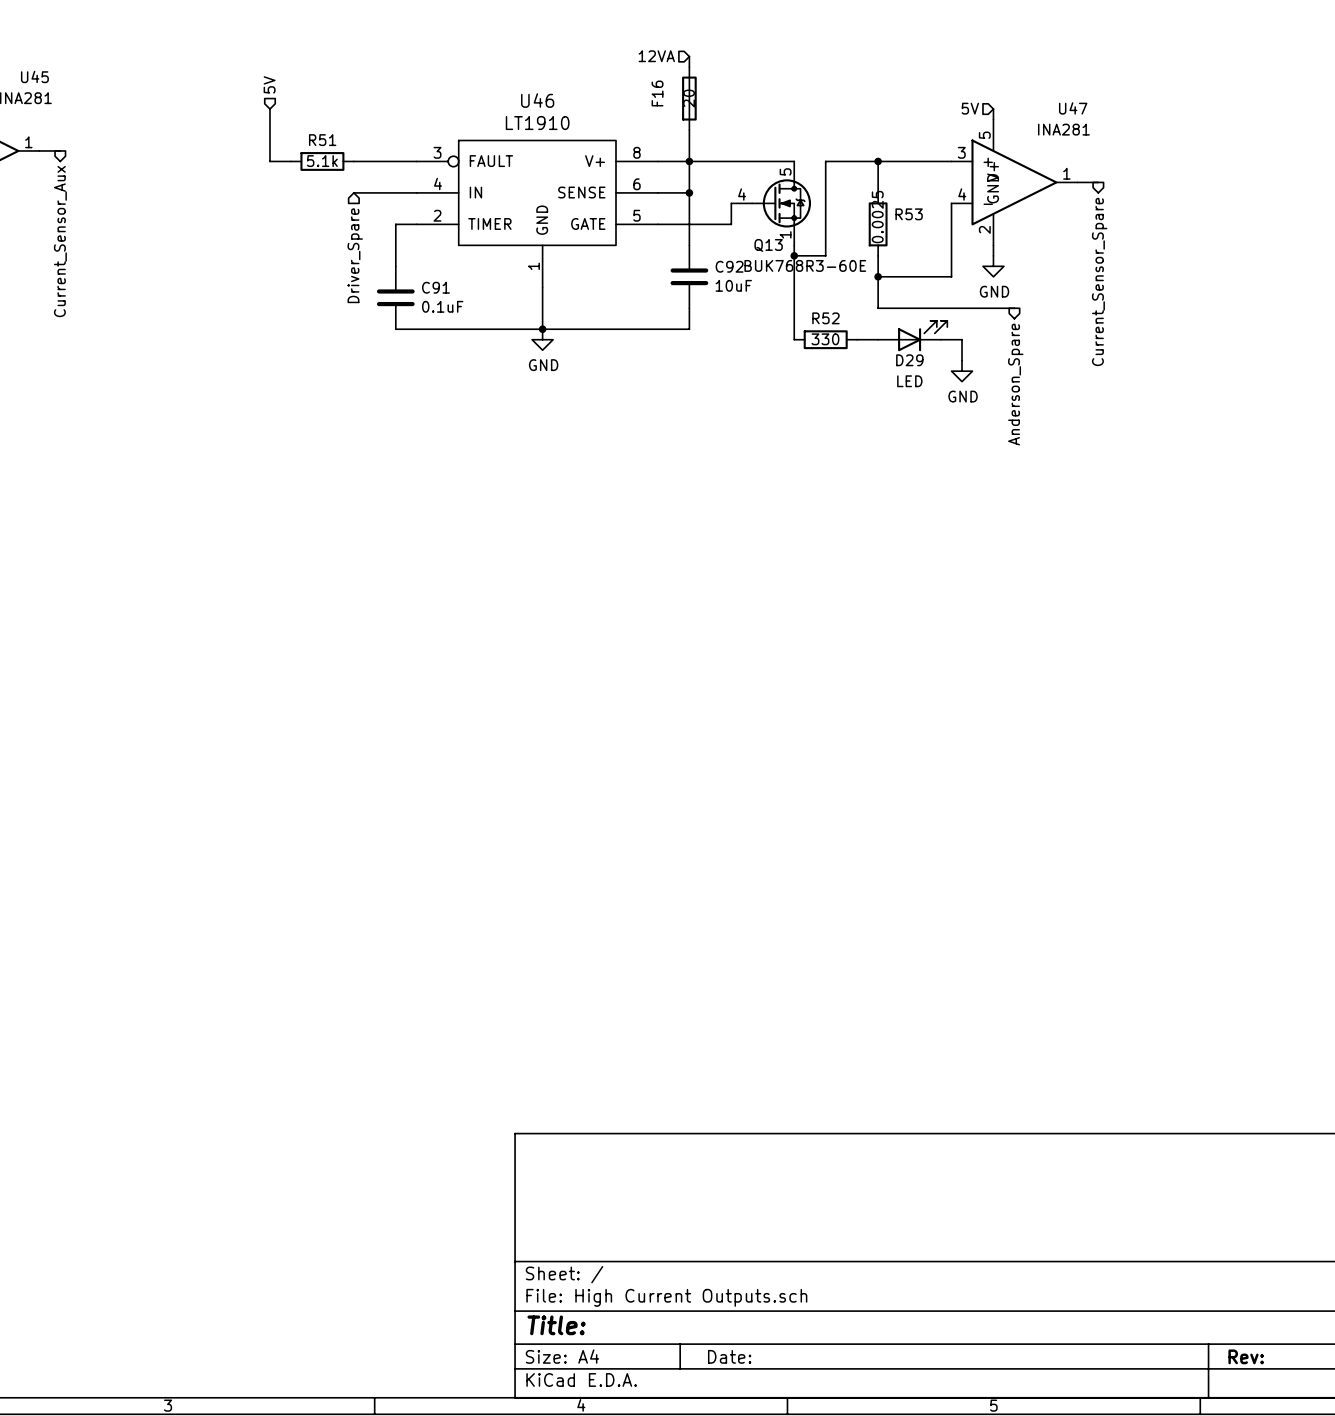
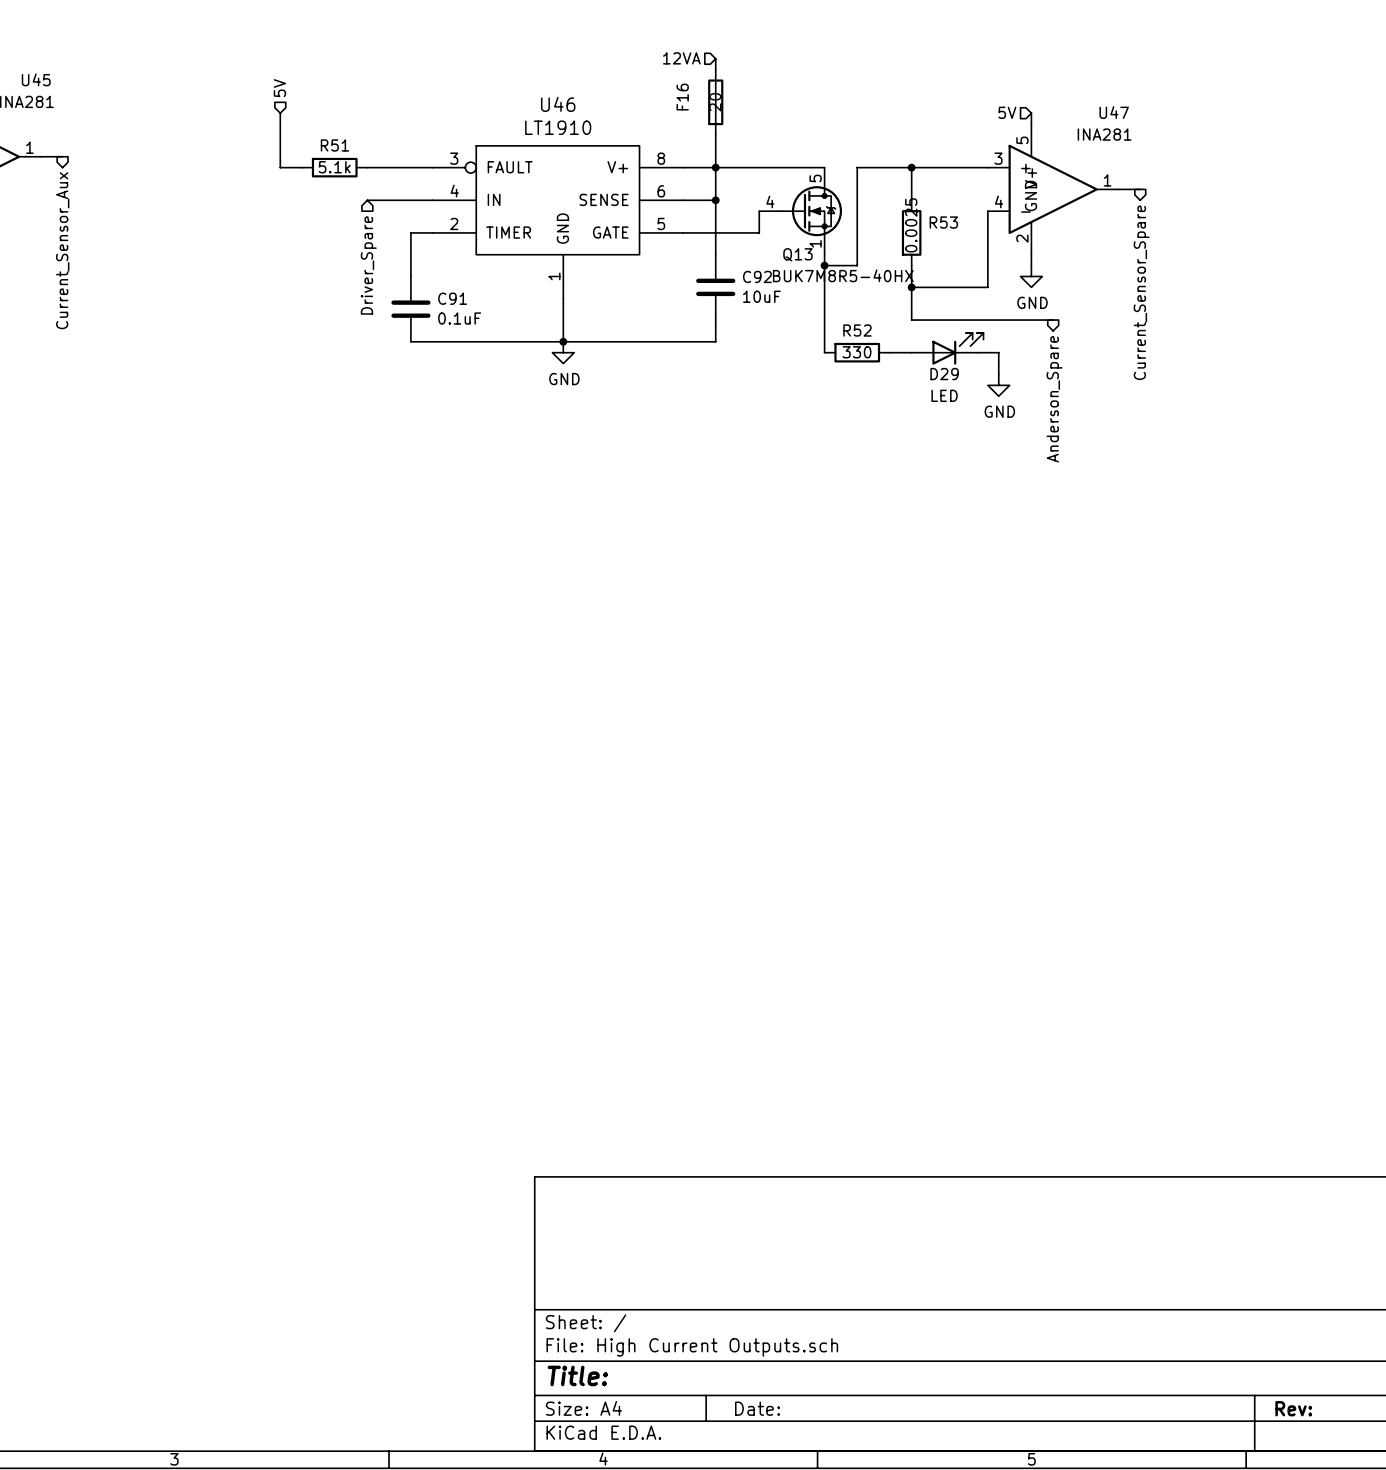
Q13 value: BUK768R3-60E (805, 265) -> BUK7M8R5-40HX (843, 275)

